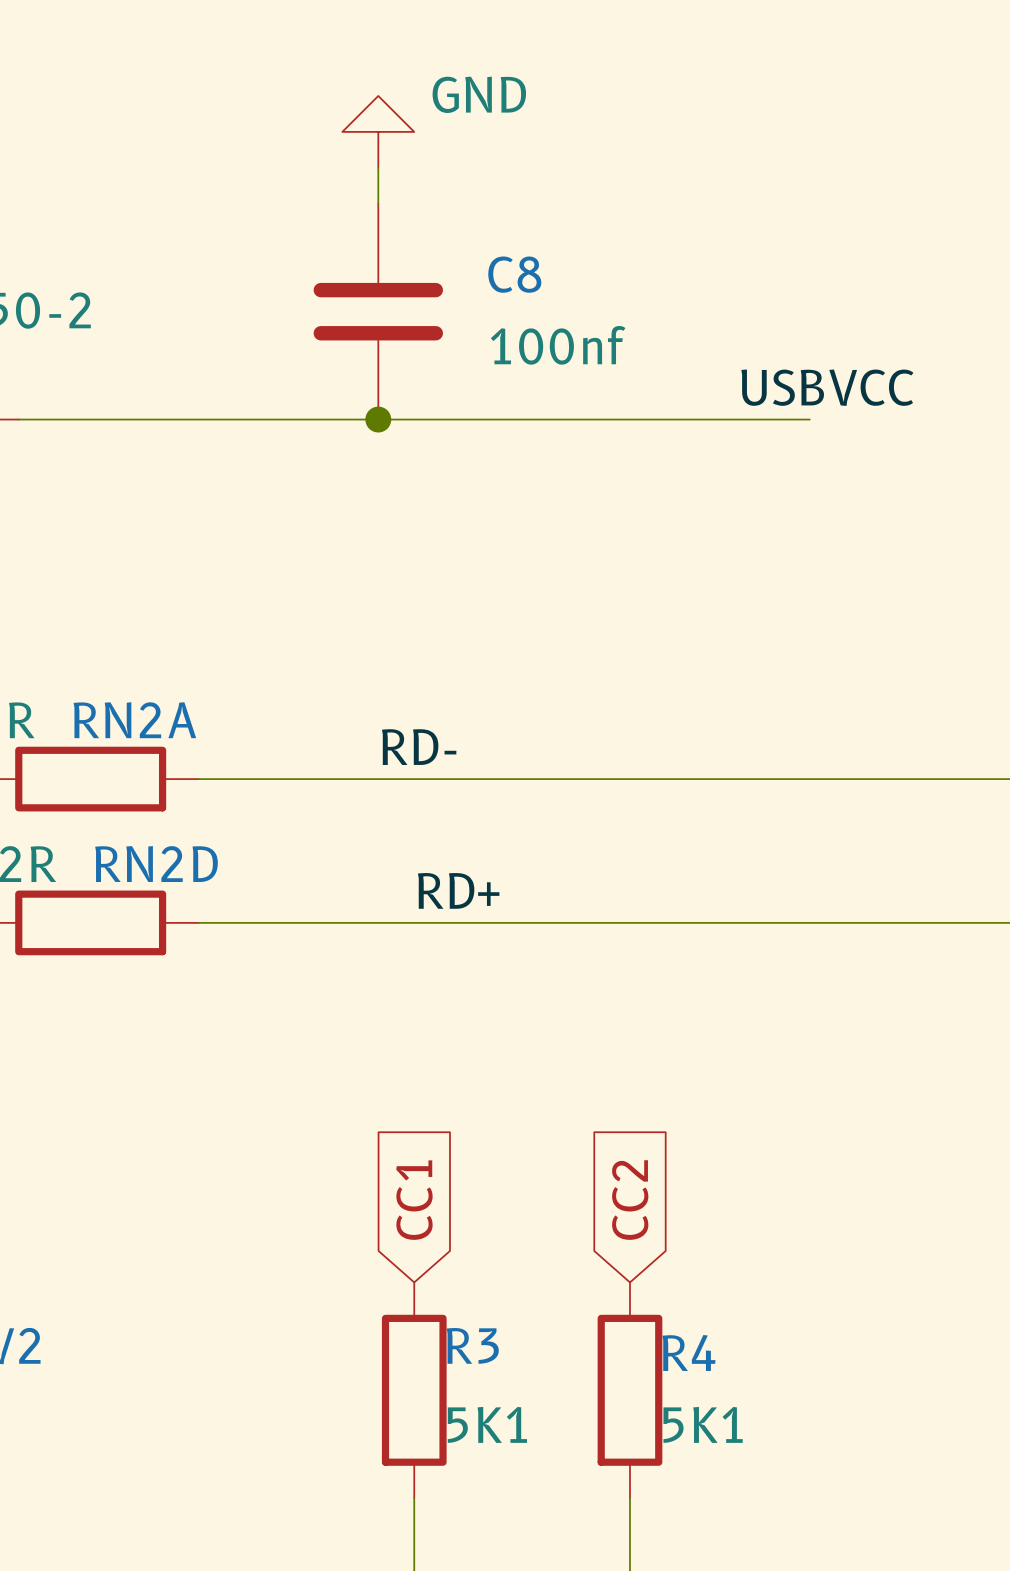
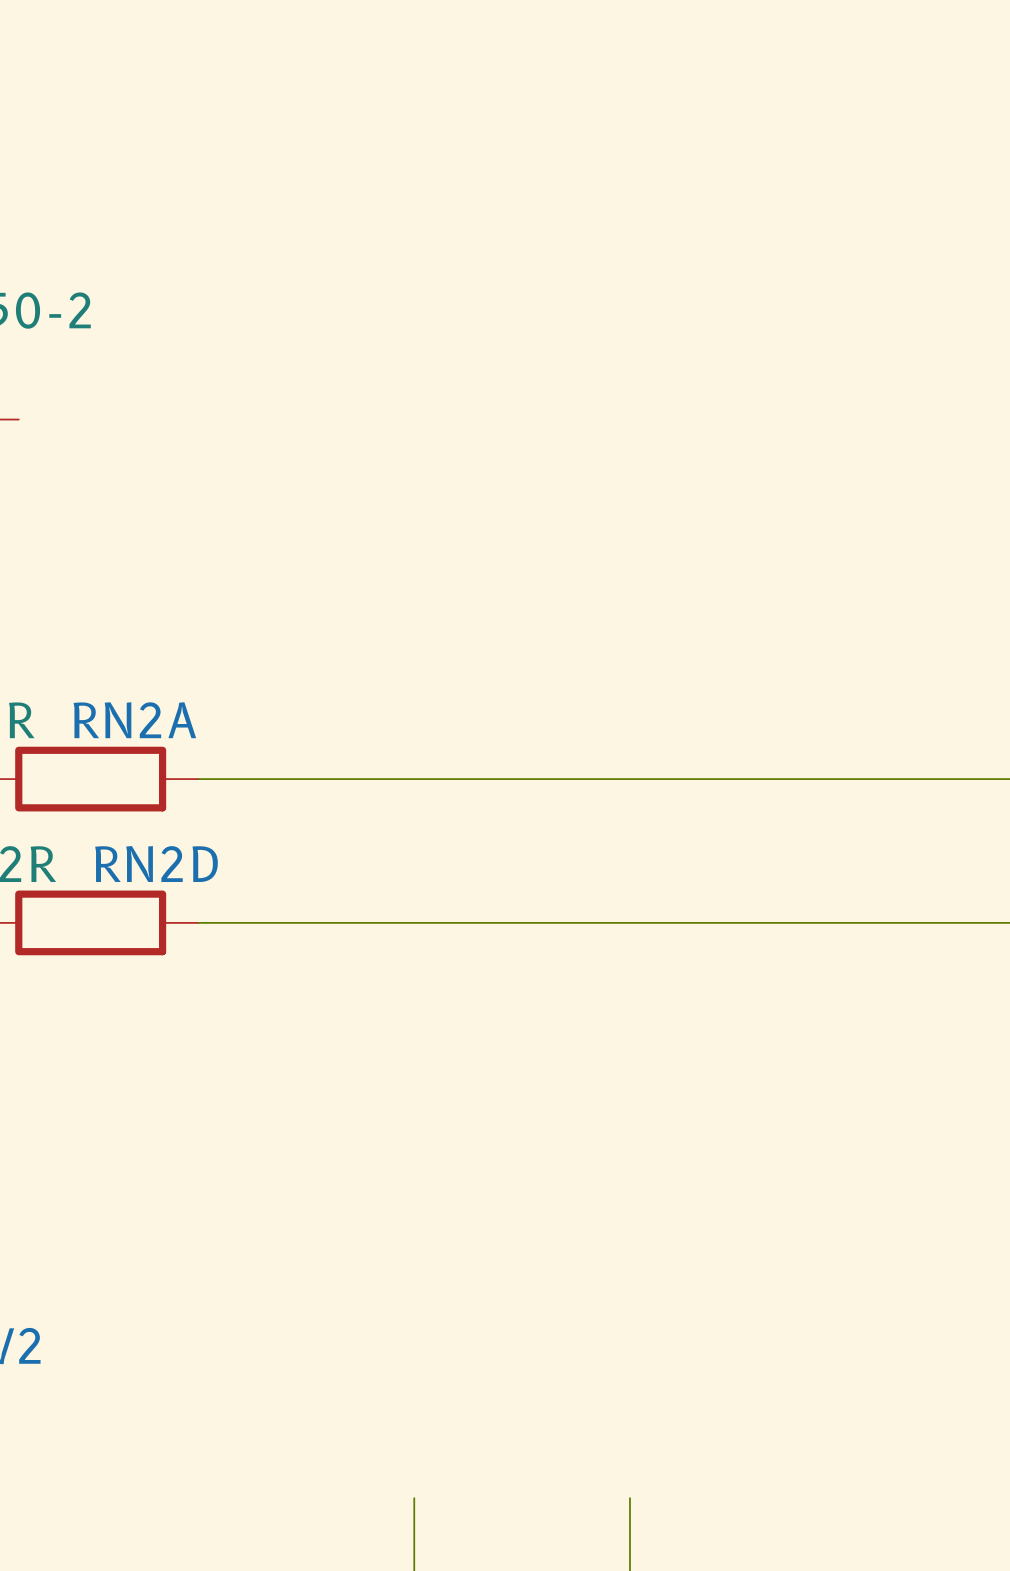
power symbol: GND (378, 131) -> none
wire: (378, 167) (378, 203) -> none
C8: 100nf (378, 311) -> none
label: USBVCC (827, 387) -> none
wire: (18, 419) (809, 419) -> none
junction: (378, 419) -> none
label: RD- (419, 747) -> none
label: RD+ (458, 890) -> none
global label: CC1 (414, 1200) -> none
global label: CC2 (630, 1200) -> none
R3: 5K1 (414, 1390) -> none
R4: 5K1 (629, 1390) -> none

